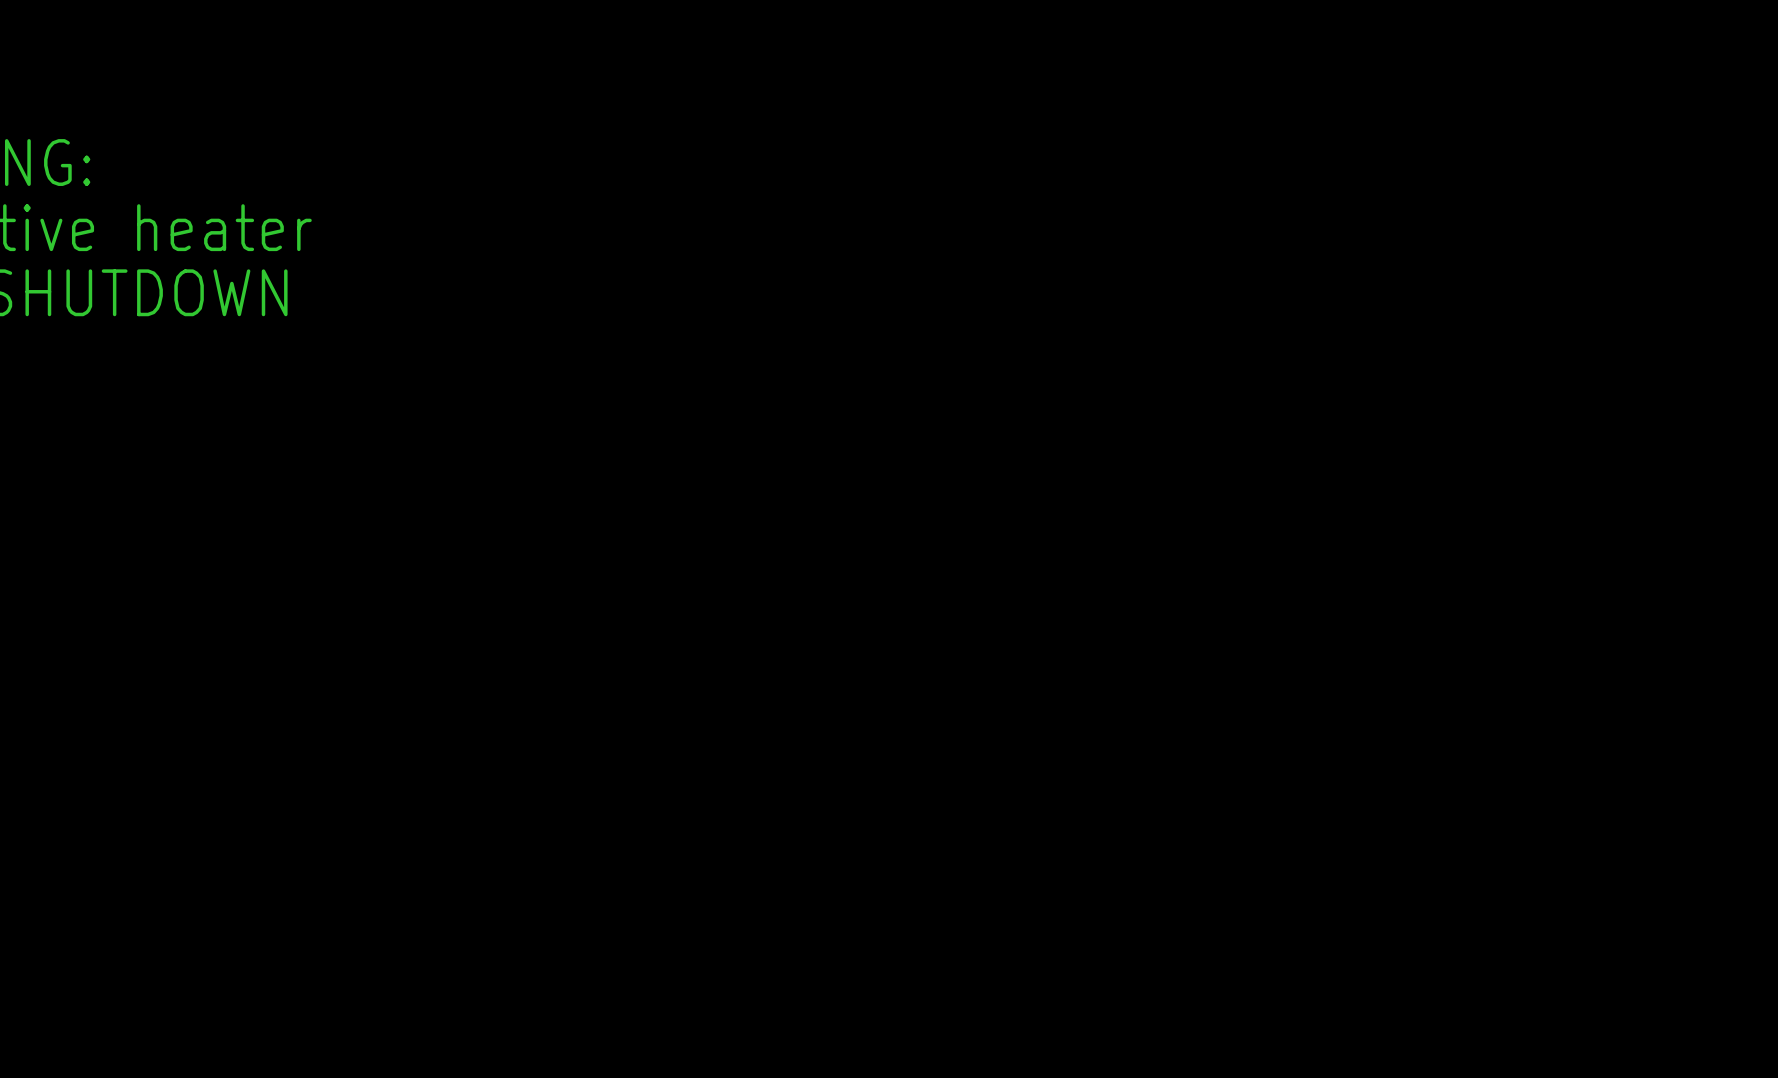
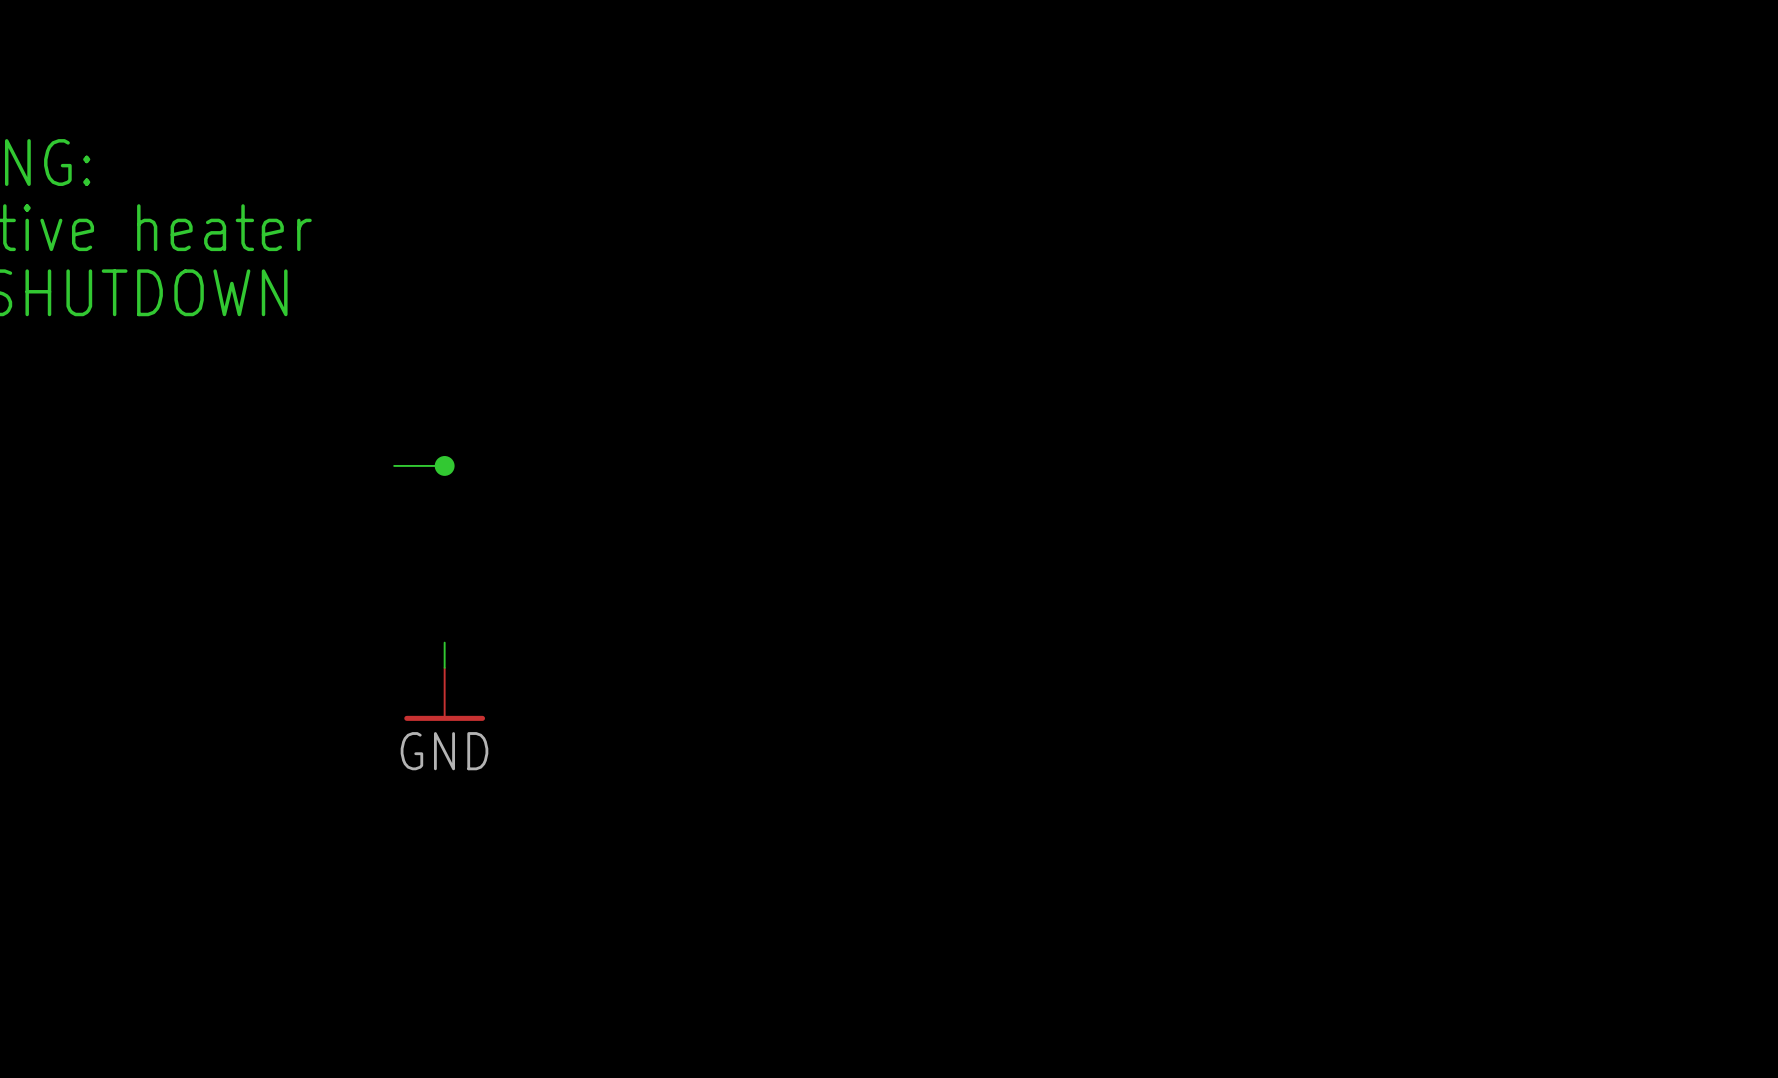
wire: none -> (394, 465) (444, 465)
junction: none -> (444, 465)
wire: none -> (444, 642) (444, 667)
power symbol: none -> GND (444, 694)

